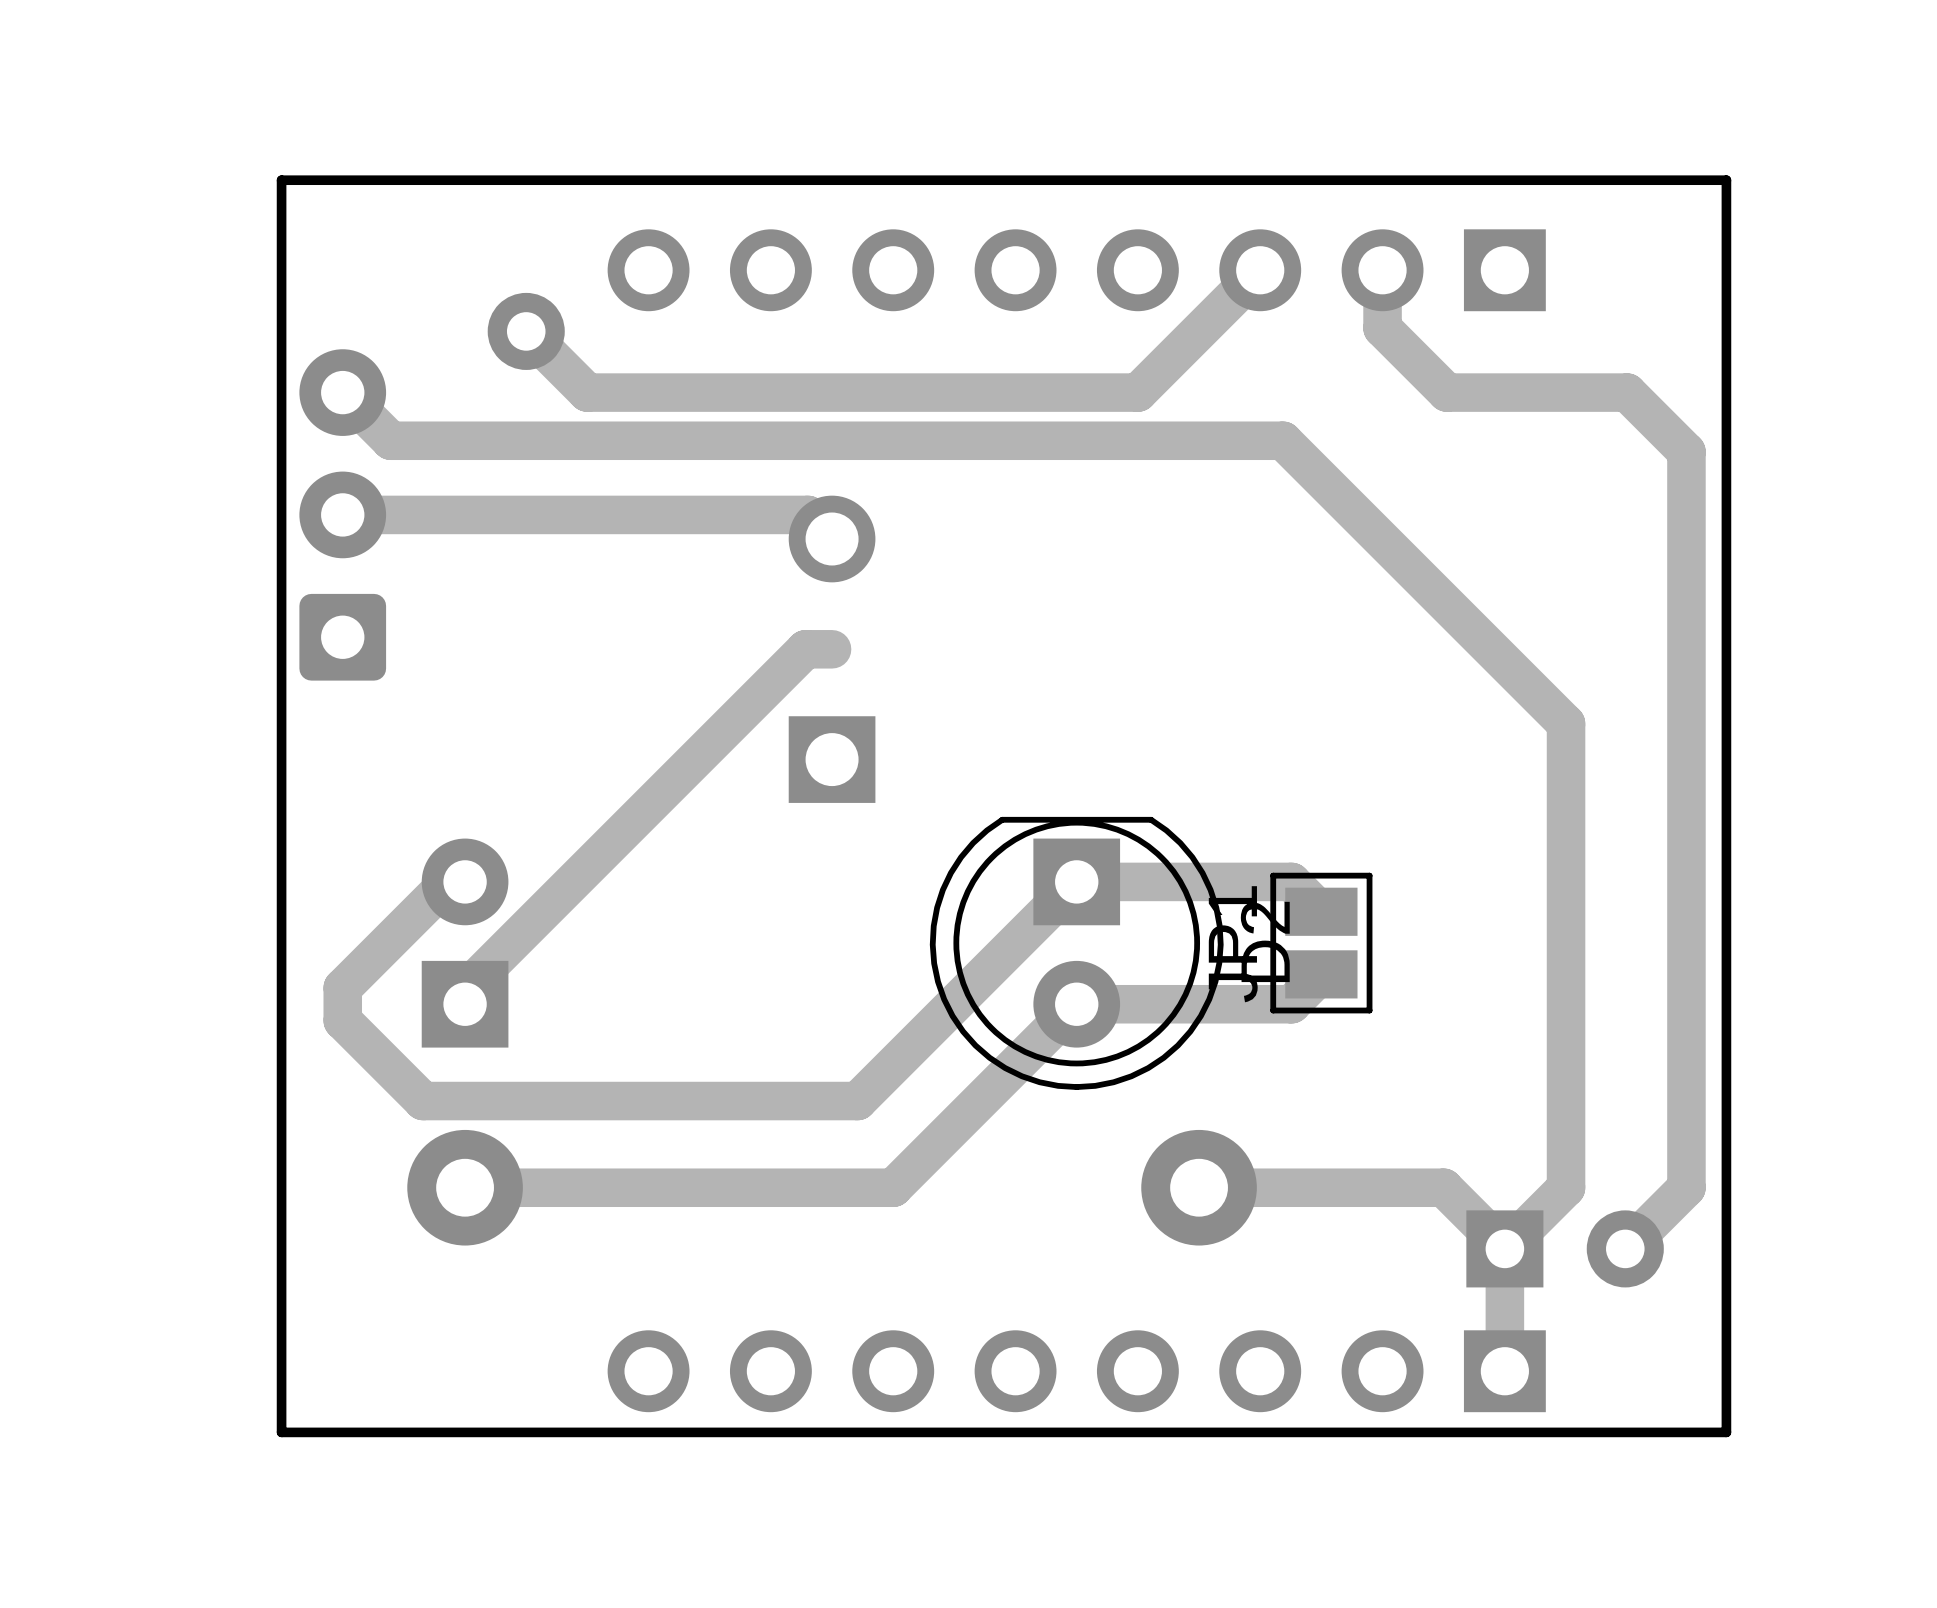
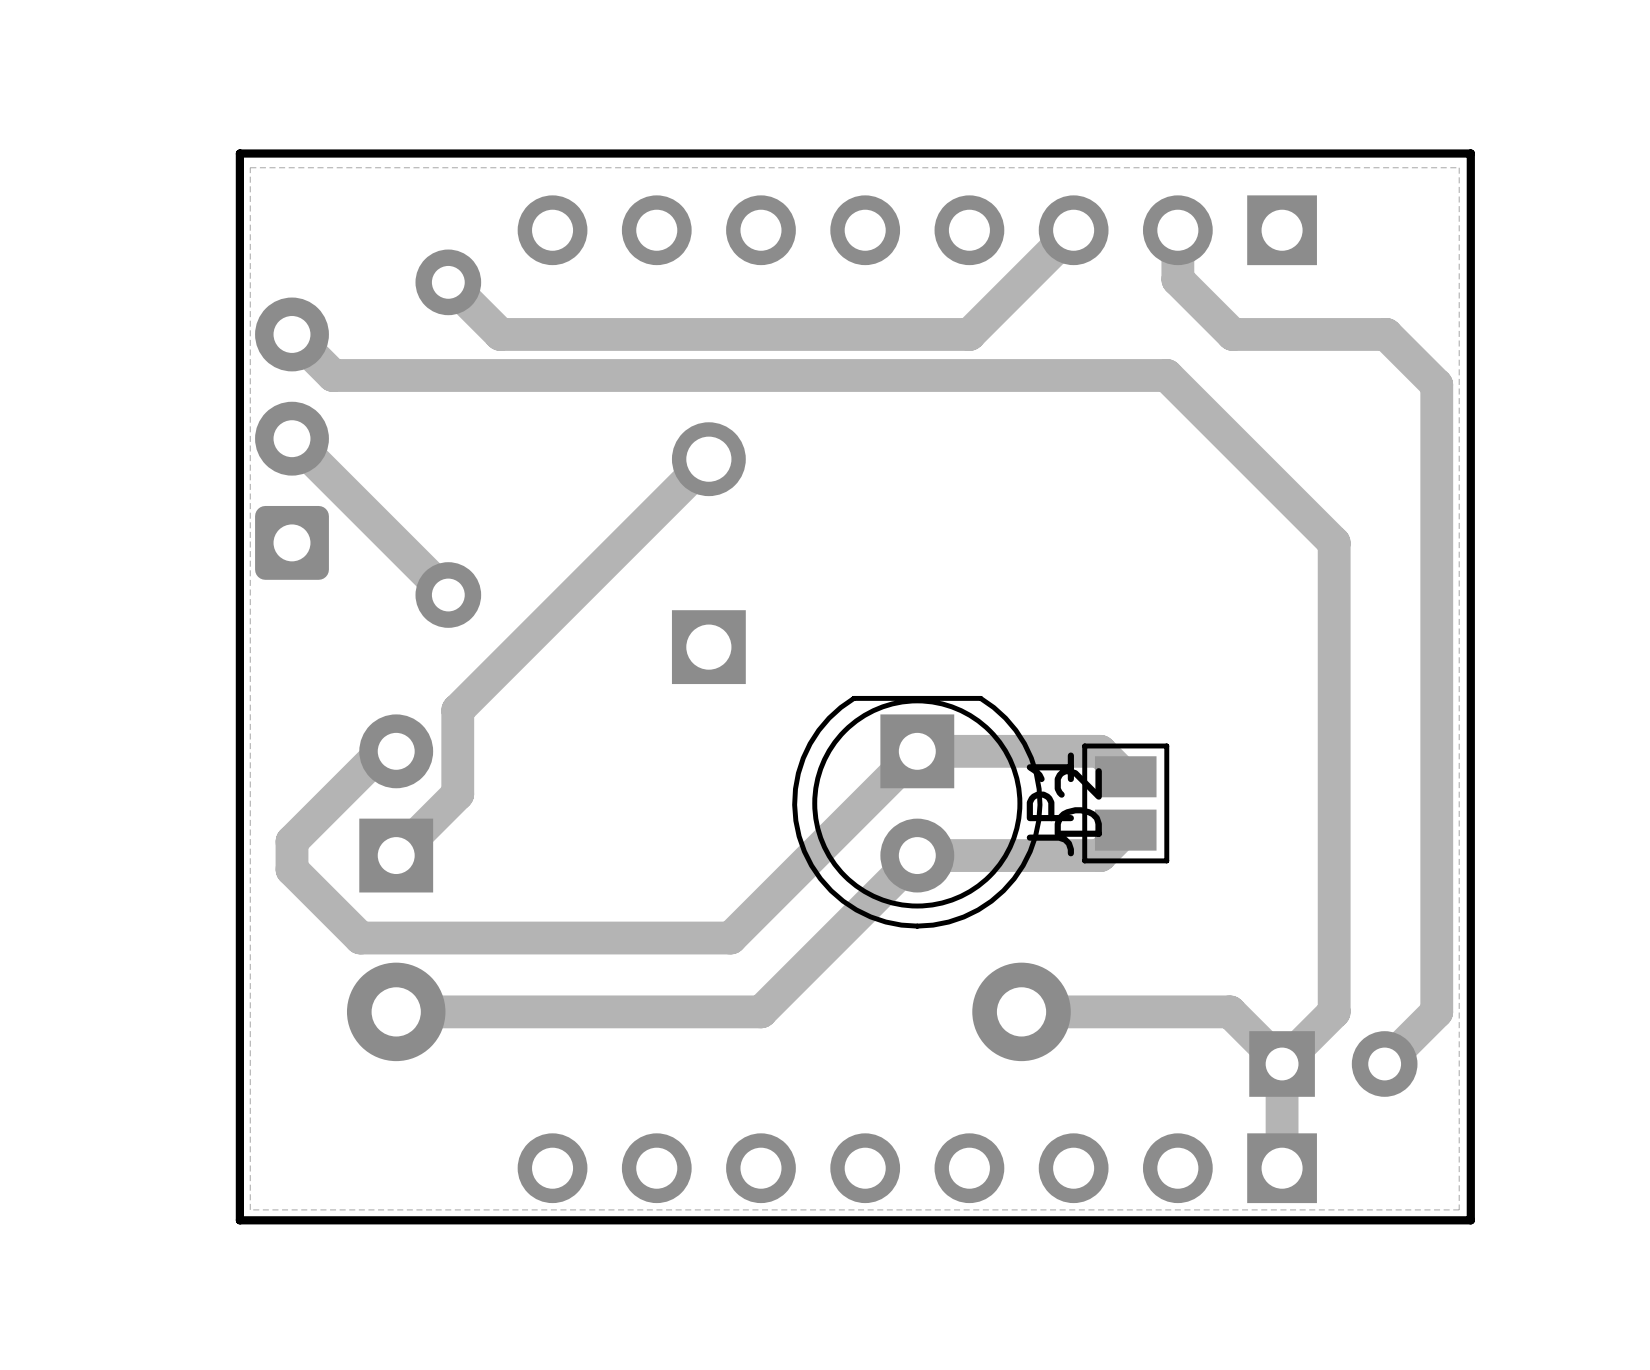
zone outline: none -> (250, 167) (250, 1209) (1459, 1209) (1459, 167) (250, 167)
track: (1283, 440) (1566, 723) -> (1093, 375) (1166, 375) (1334, 542) (1334, 616)
track: (342, 514) (807, 514) (832, 539) -> (292, 438) (448, 595)
track: none -> (708, 459) (457, 710) (457, 794) (396, 855)
track: (832, 649) (805, 649) (465, 989) -> none
via: none -> (448, 595)

